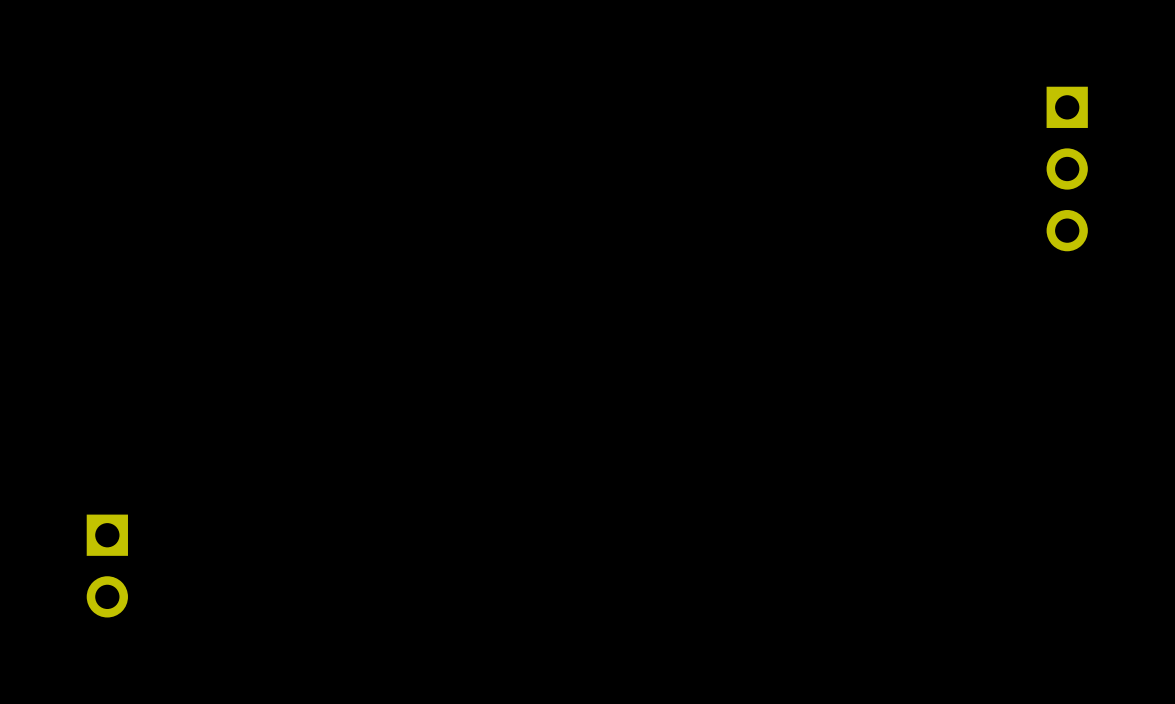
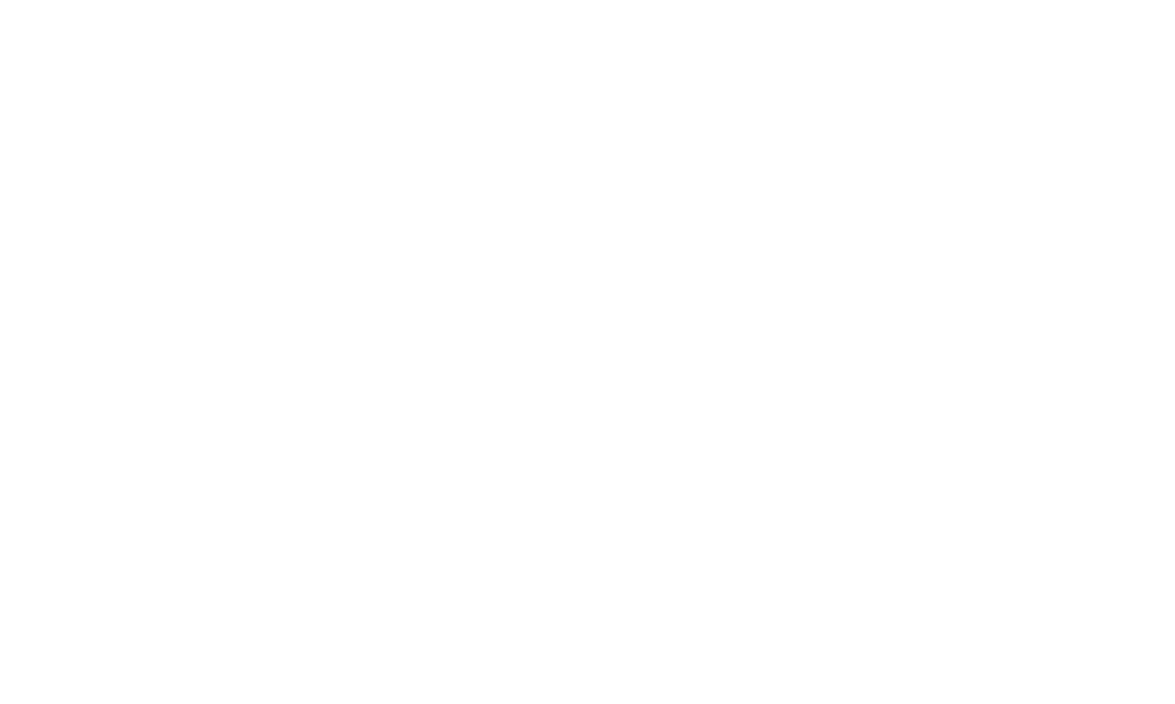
part: (1067, 168) -> none
part: (107, 566) -> none

